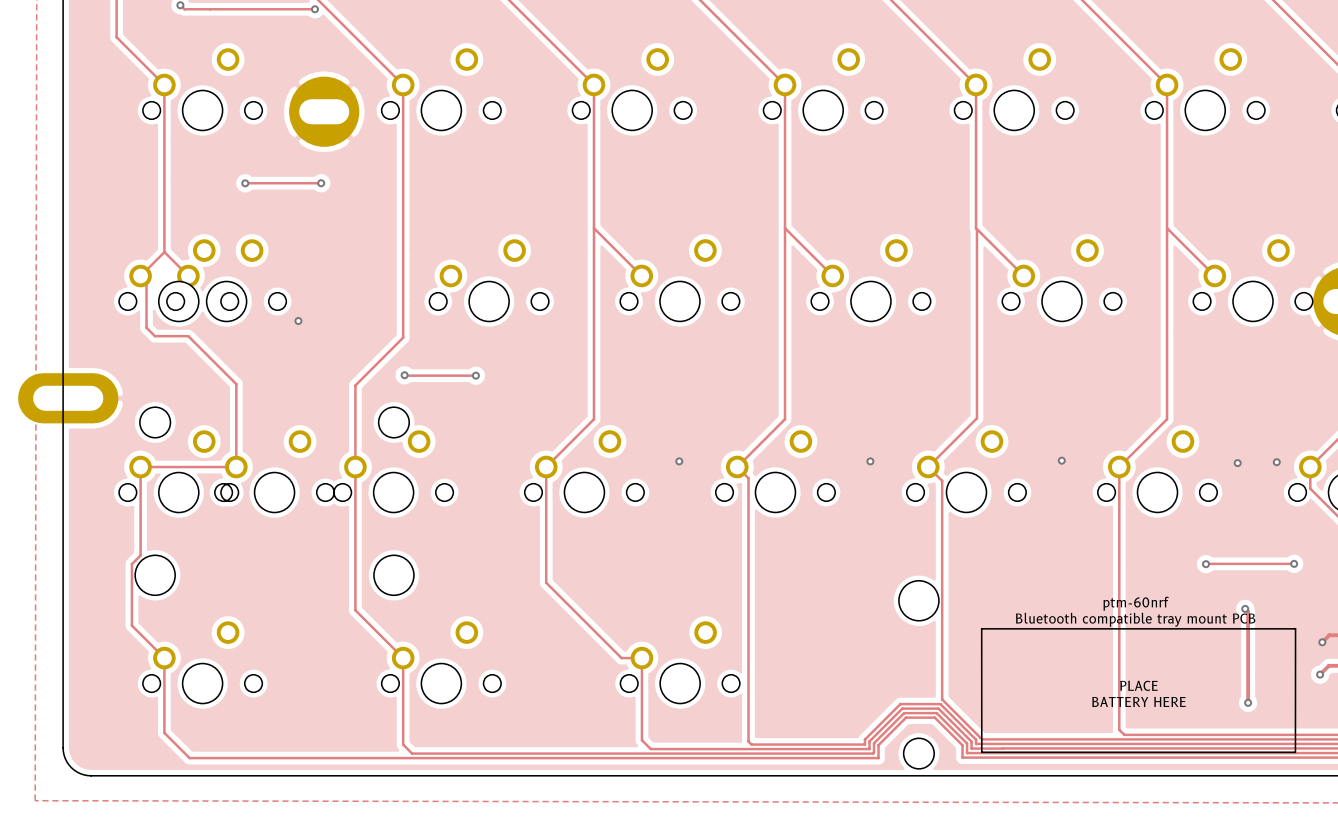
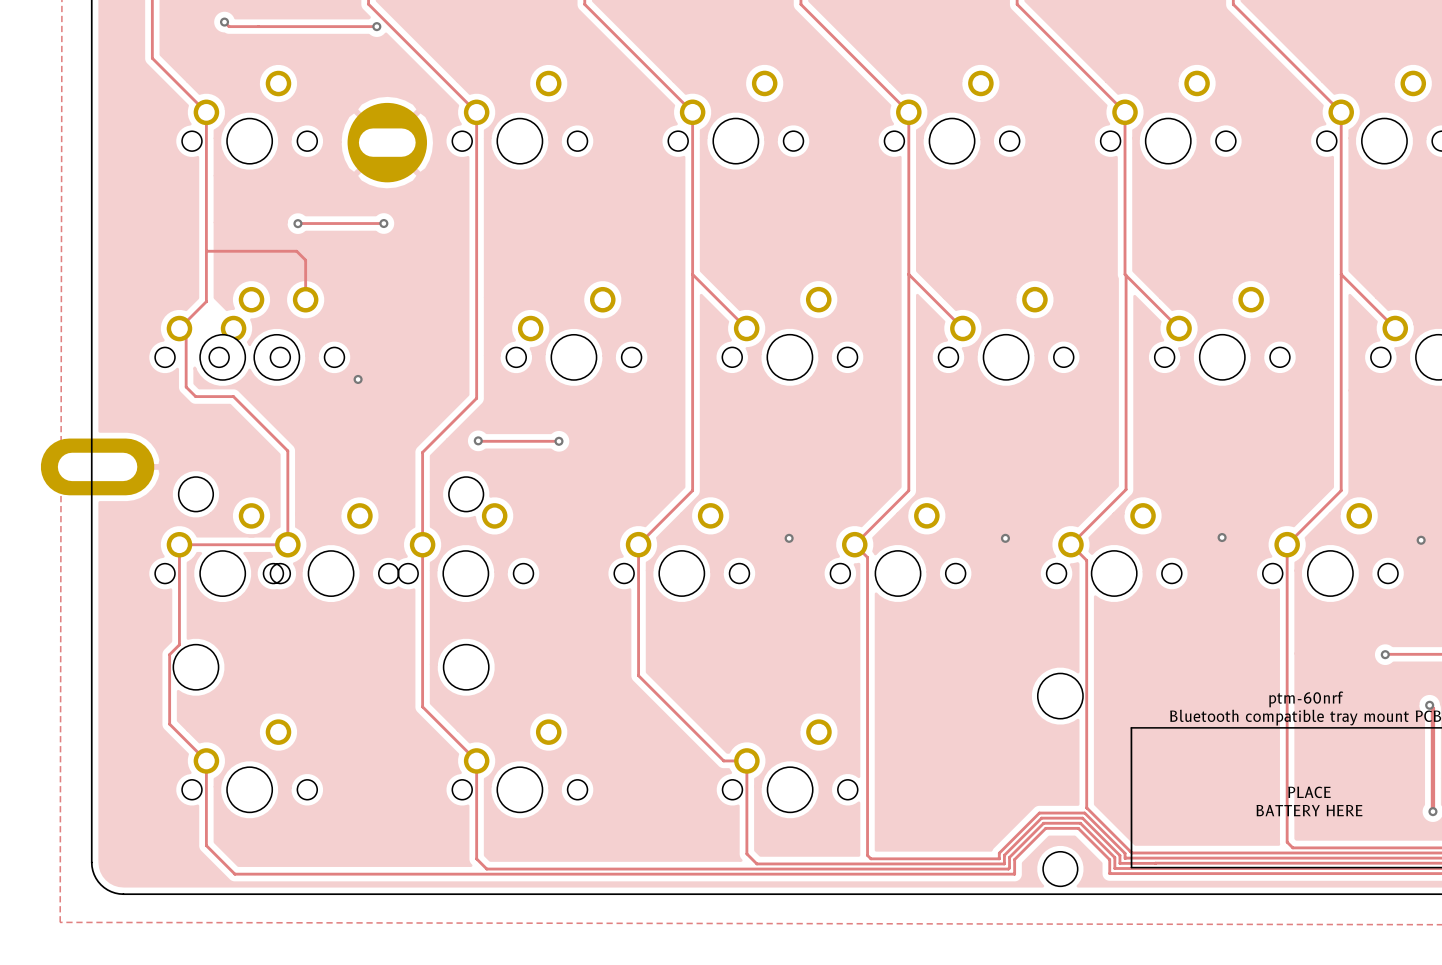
track: none -> (206, 251) (296, 251) (305, 260) (305, 299)
track: (164, 252) (188, 276) -> none

